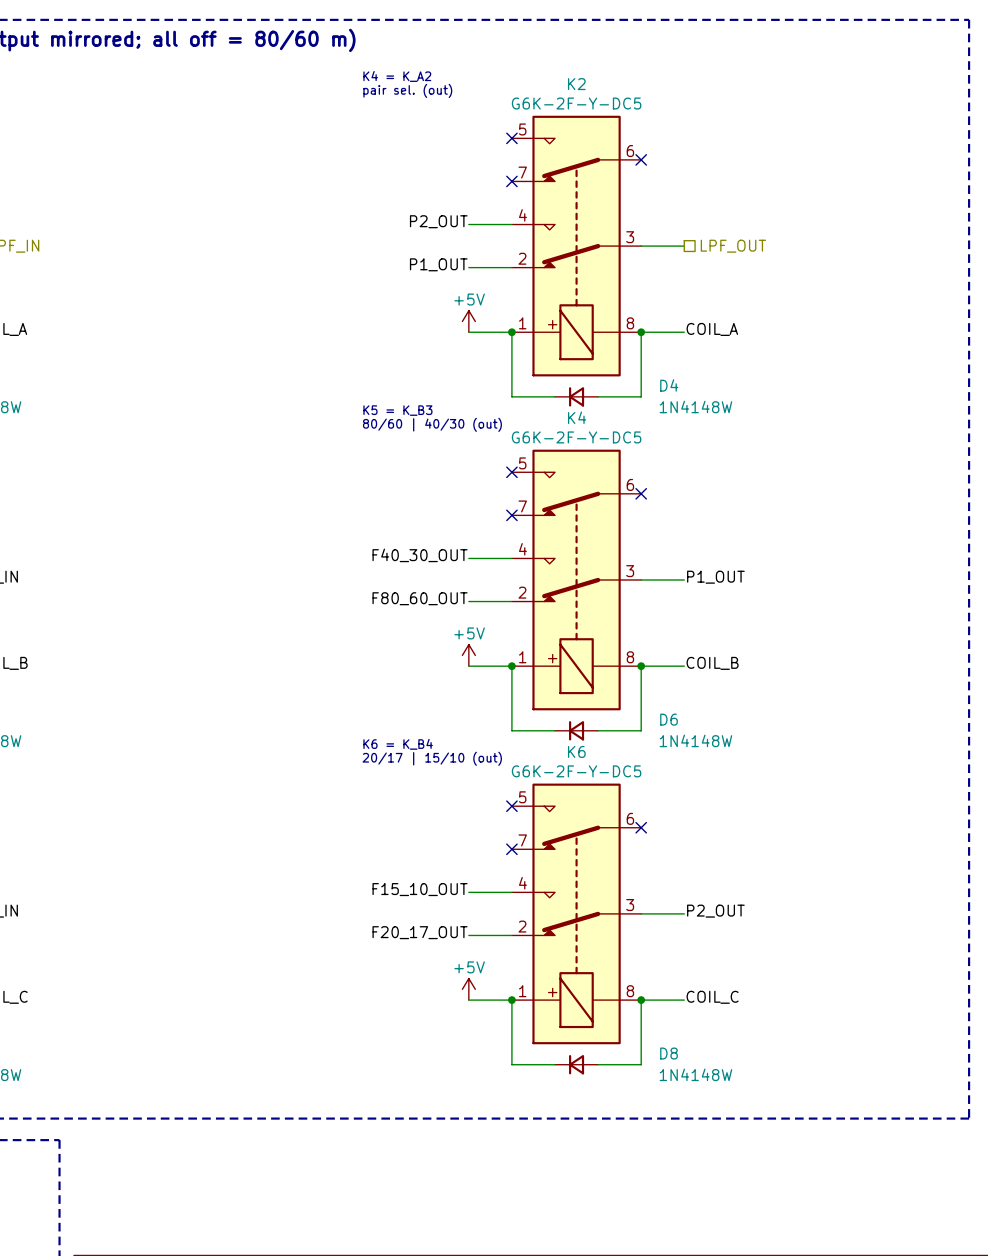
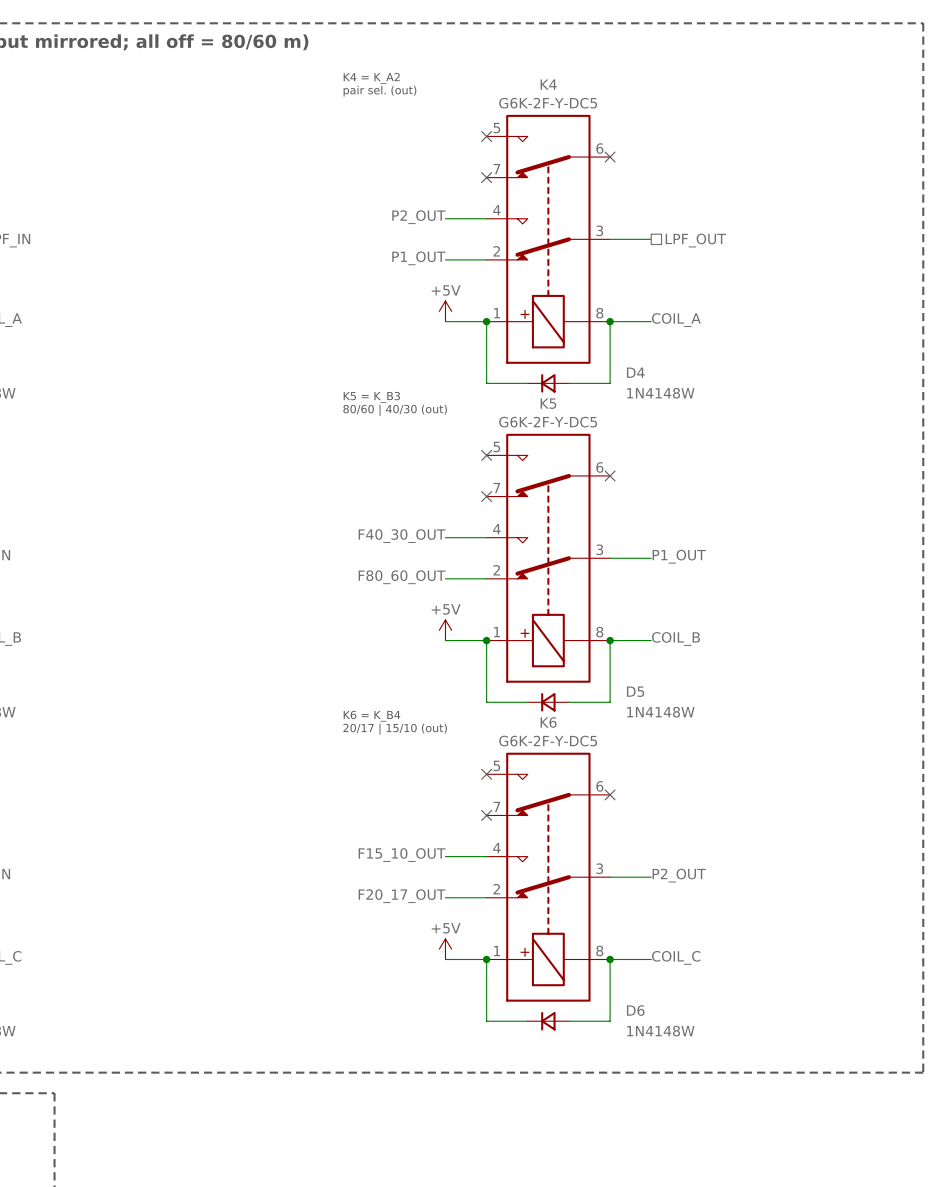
K2 name: K2 (576, 84) -> K4 (548, 84)
K4 name: K4 (577, 417) -> K5 (548, 403)
D6 name: D6 (669, 719) -> D5 (635, 691)
D8 name: D8 (669, 1053) -> D6 (635, 1010)

